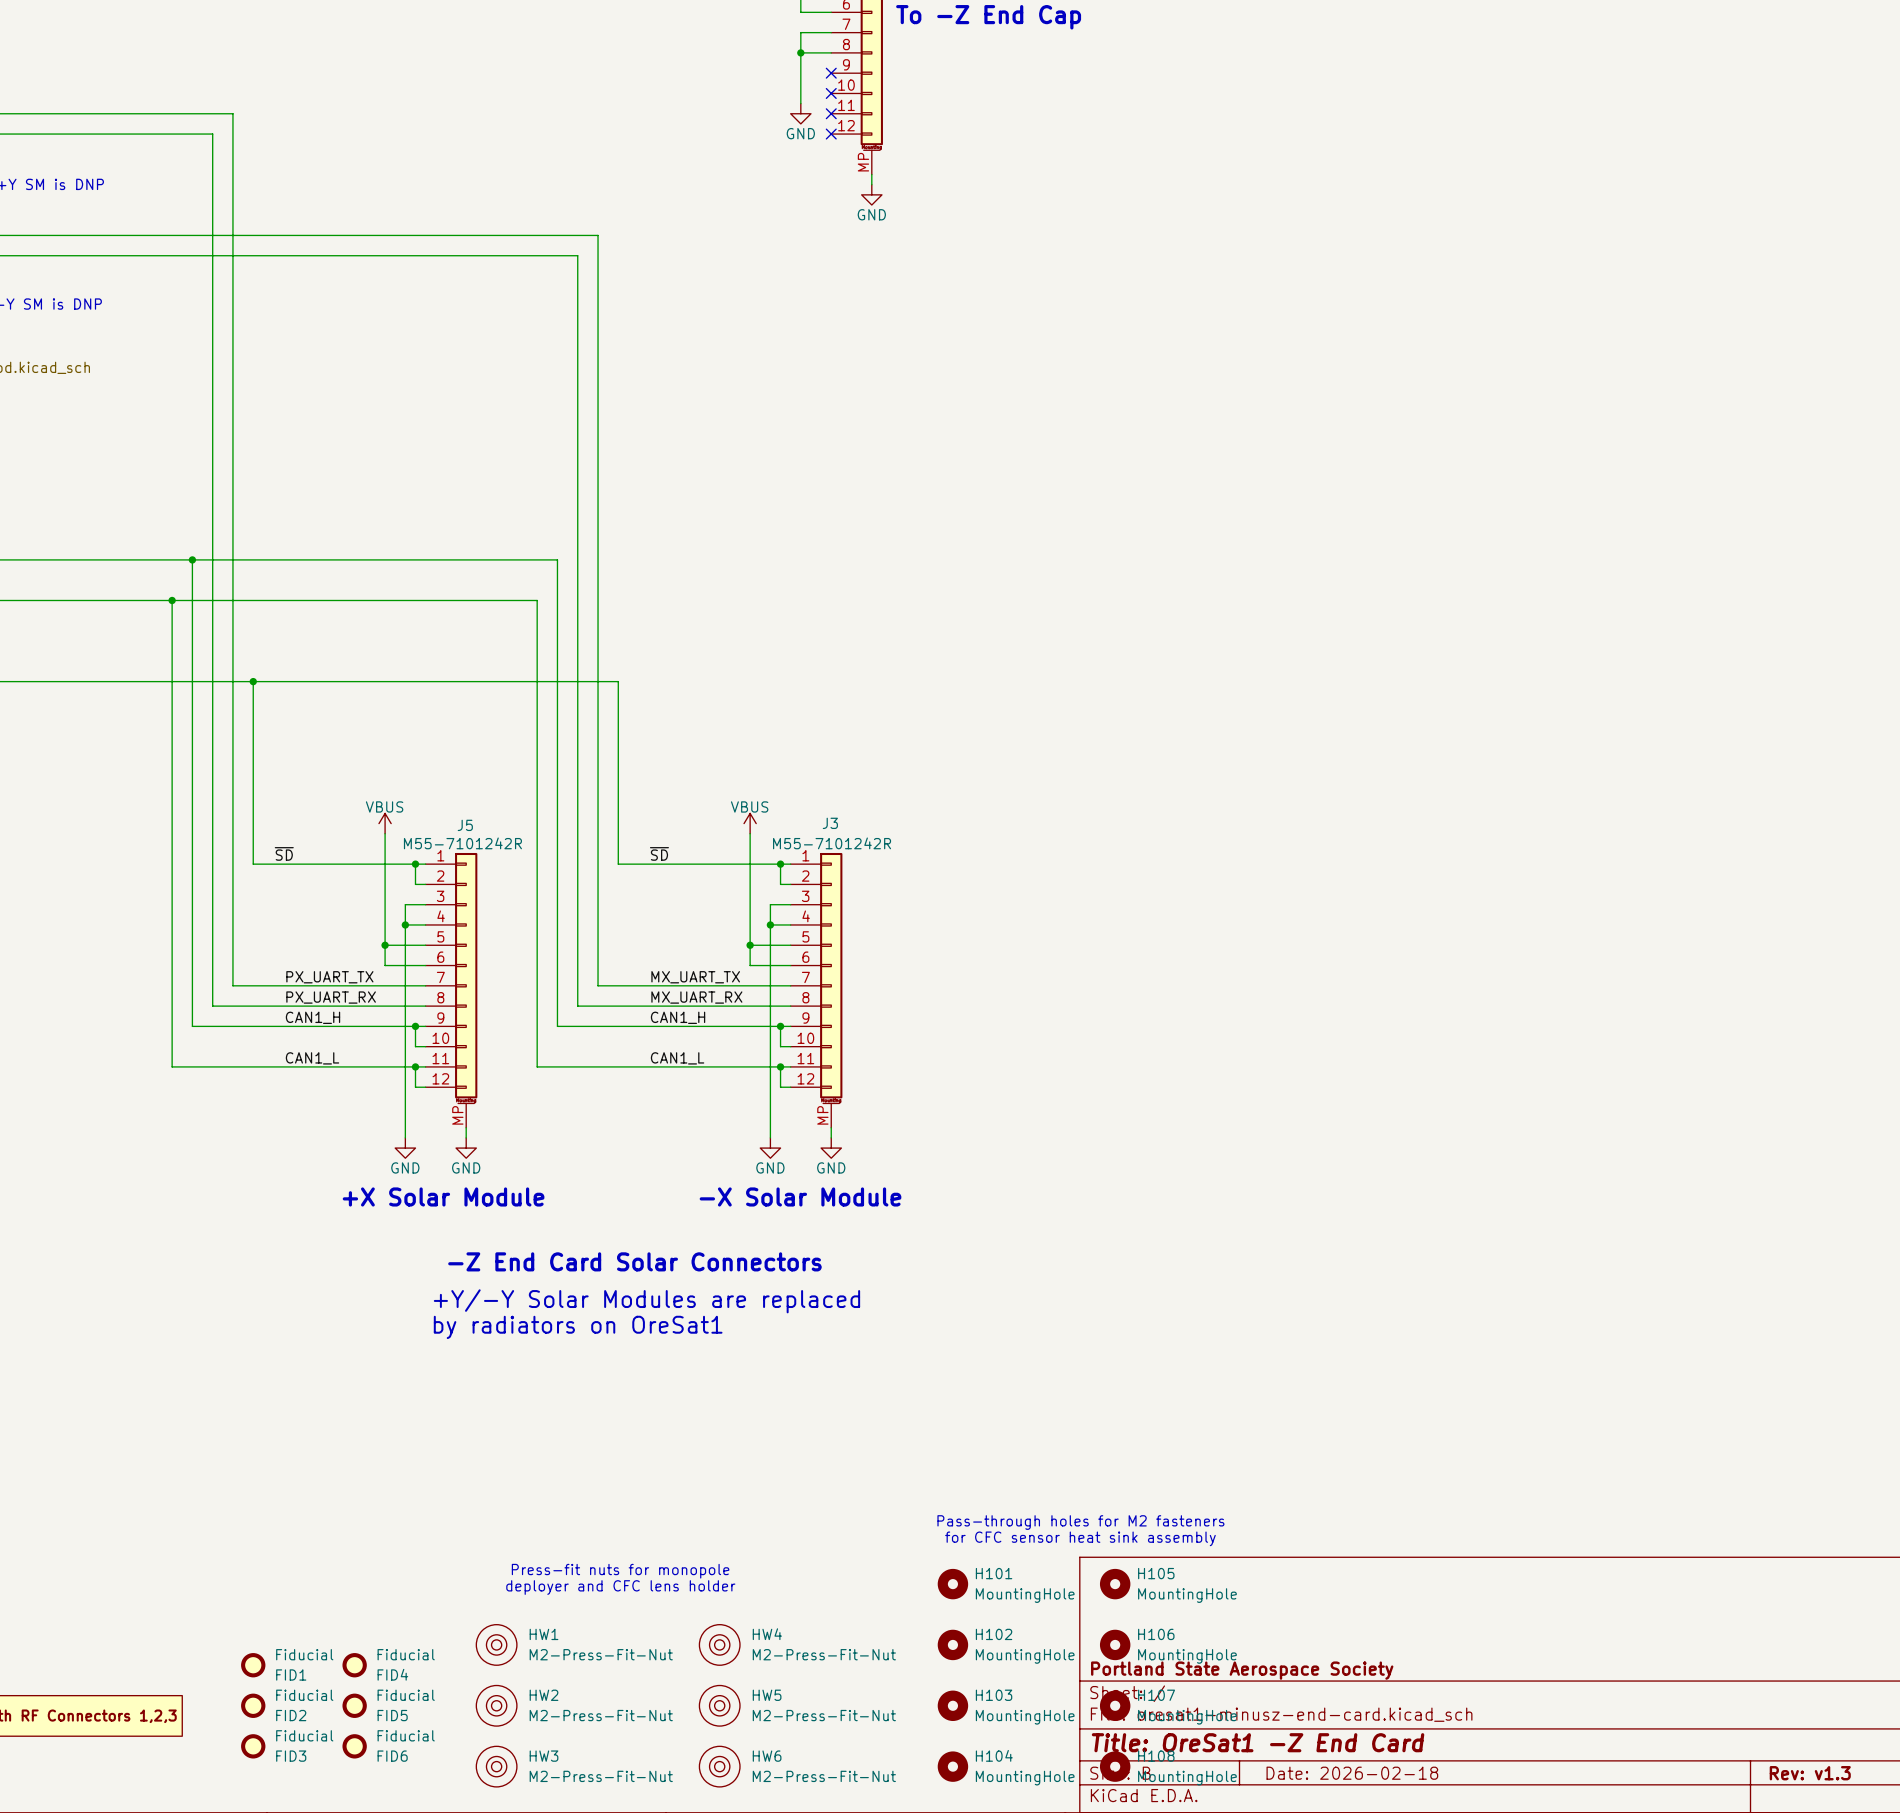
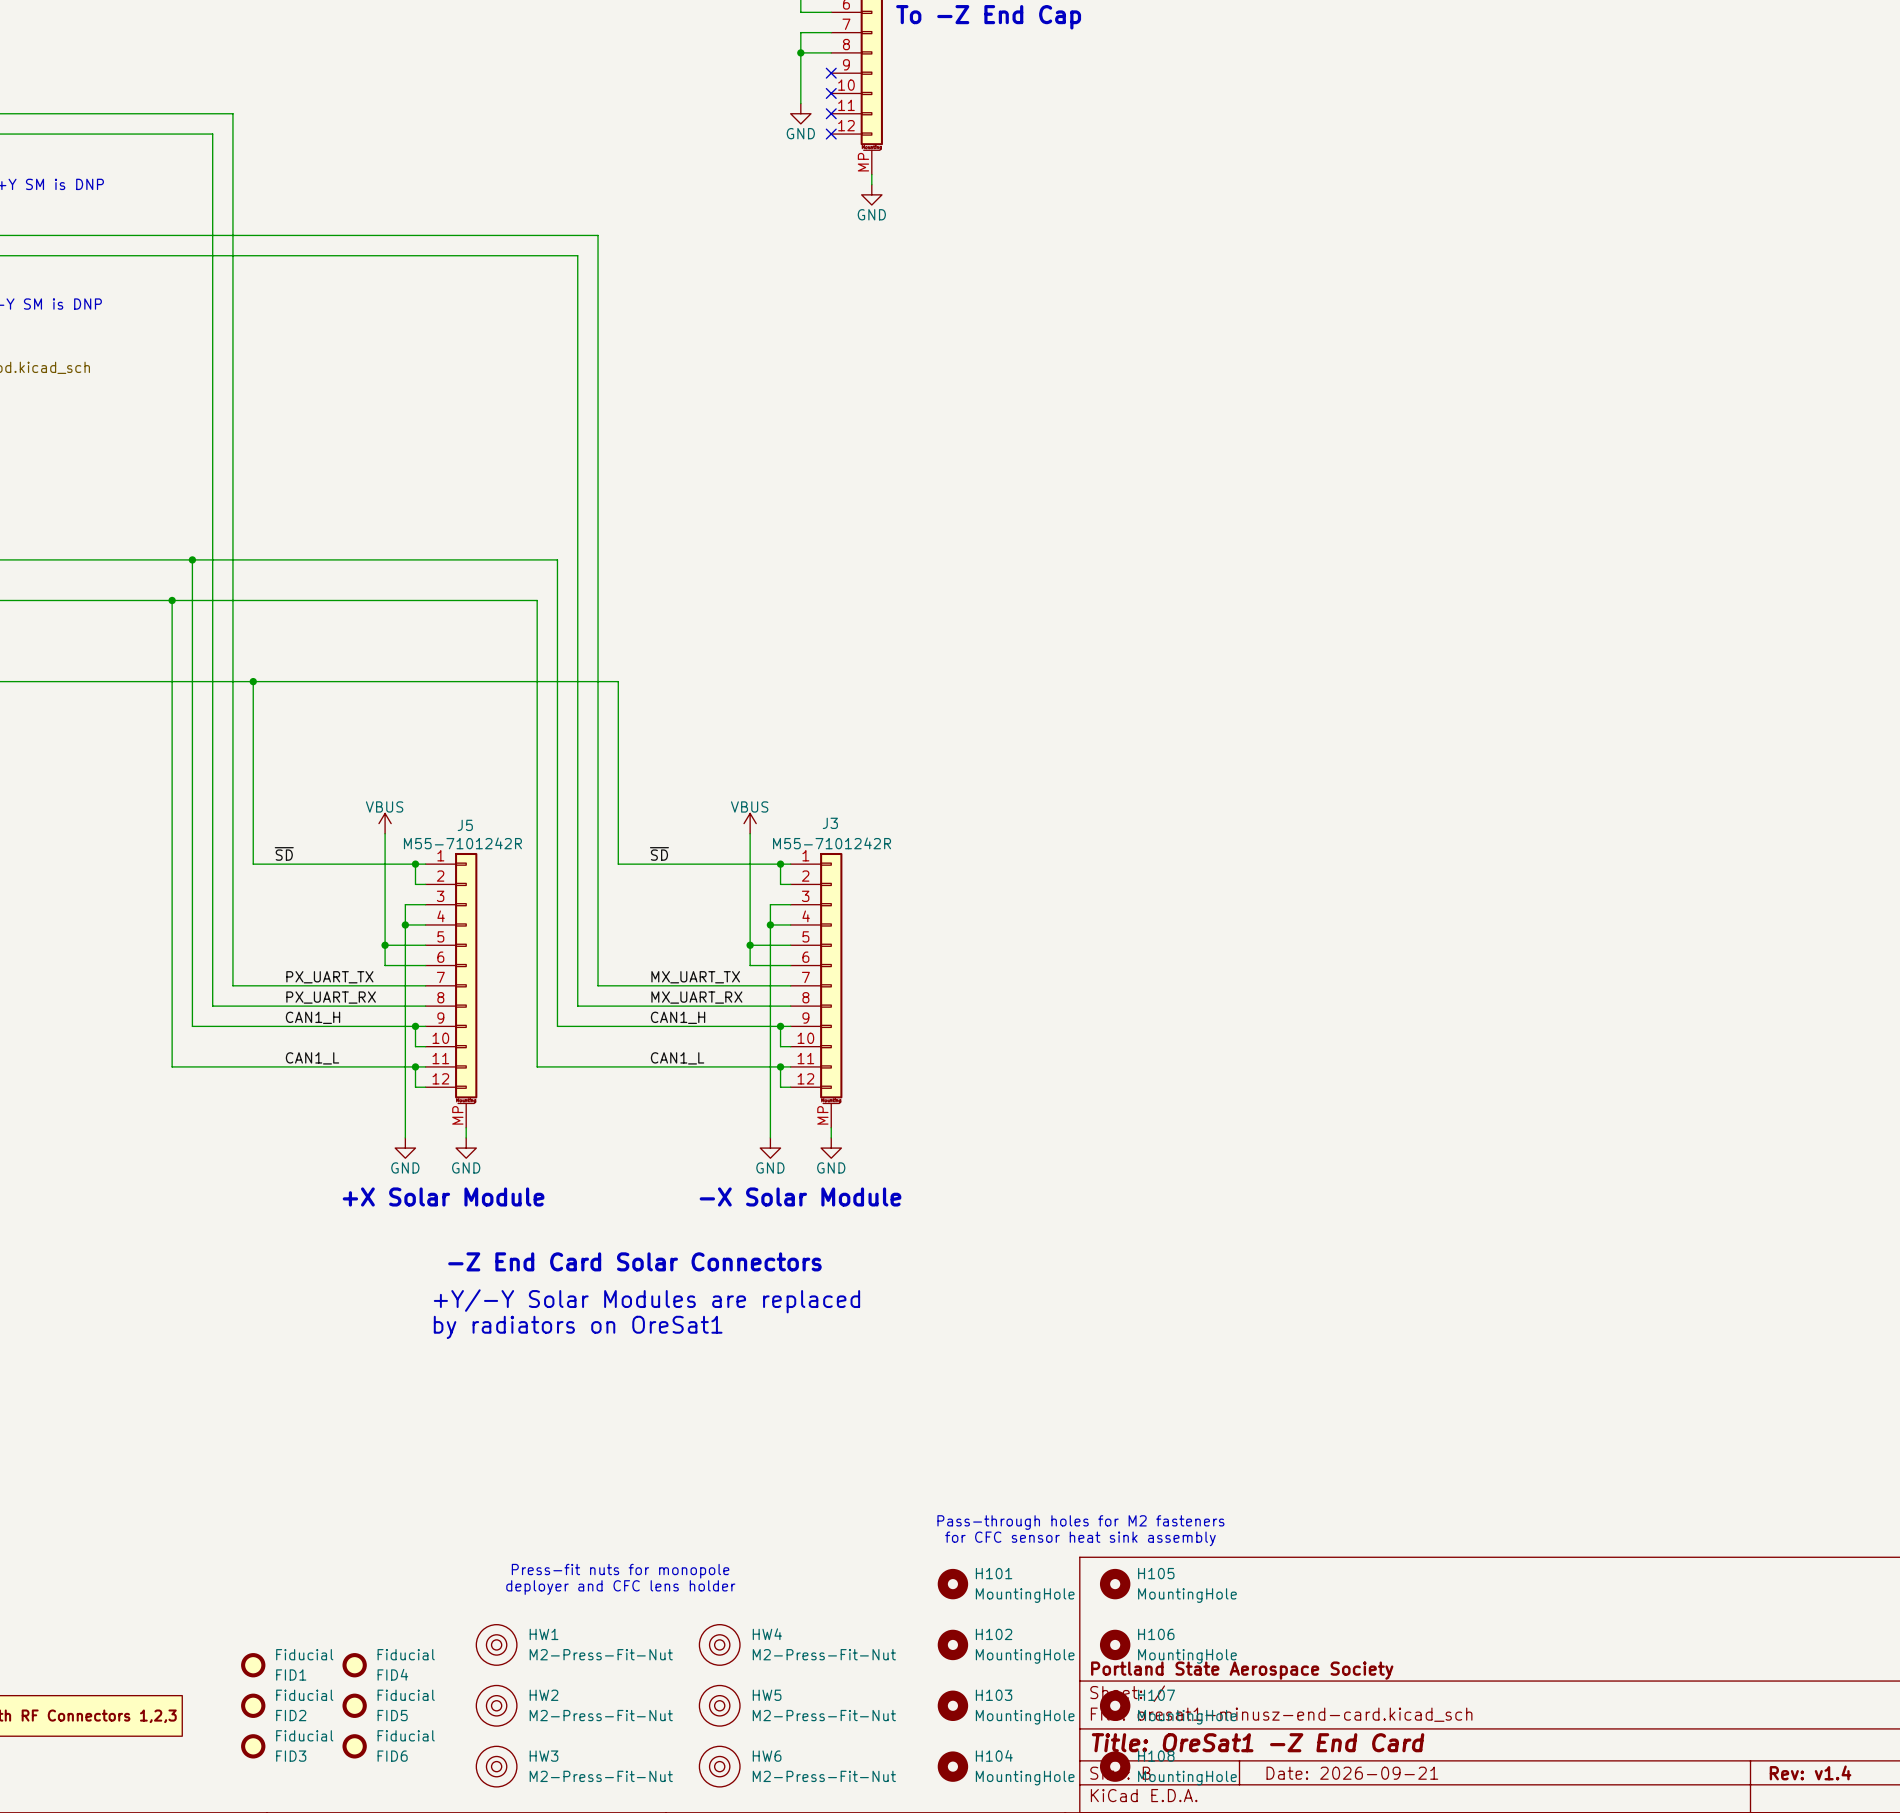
title block: Date: 2026-02-18 (1352, 1773) -> Date: 2026-09-21 (1352, 1773)
title block: Rev: v1.3 (1810, 1773) -> Rev: v1.4 (1810, 1772)

